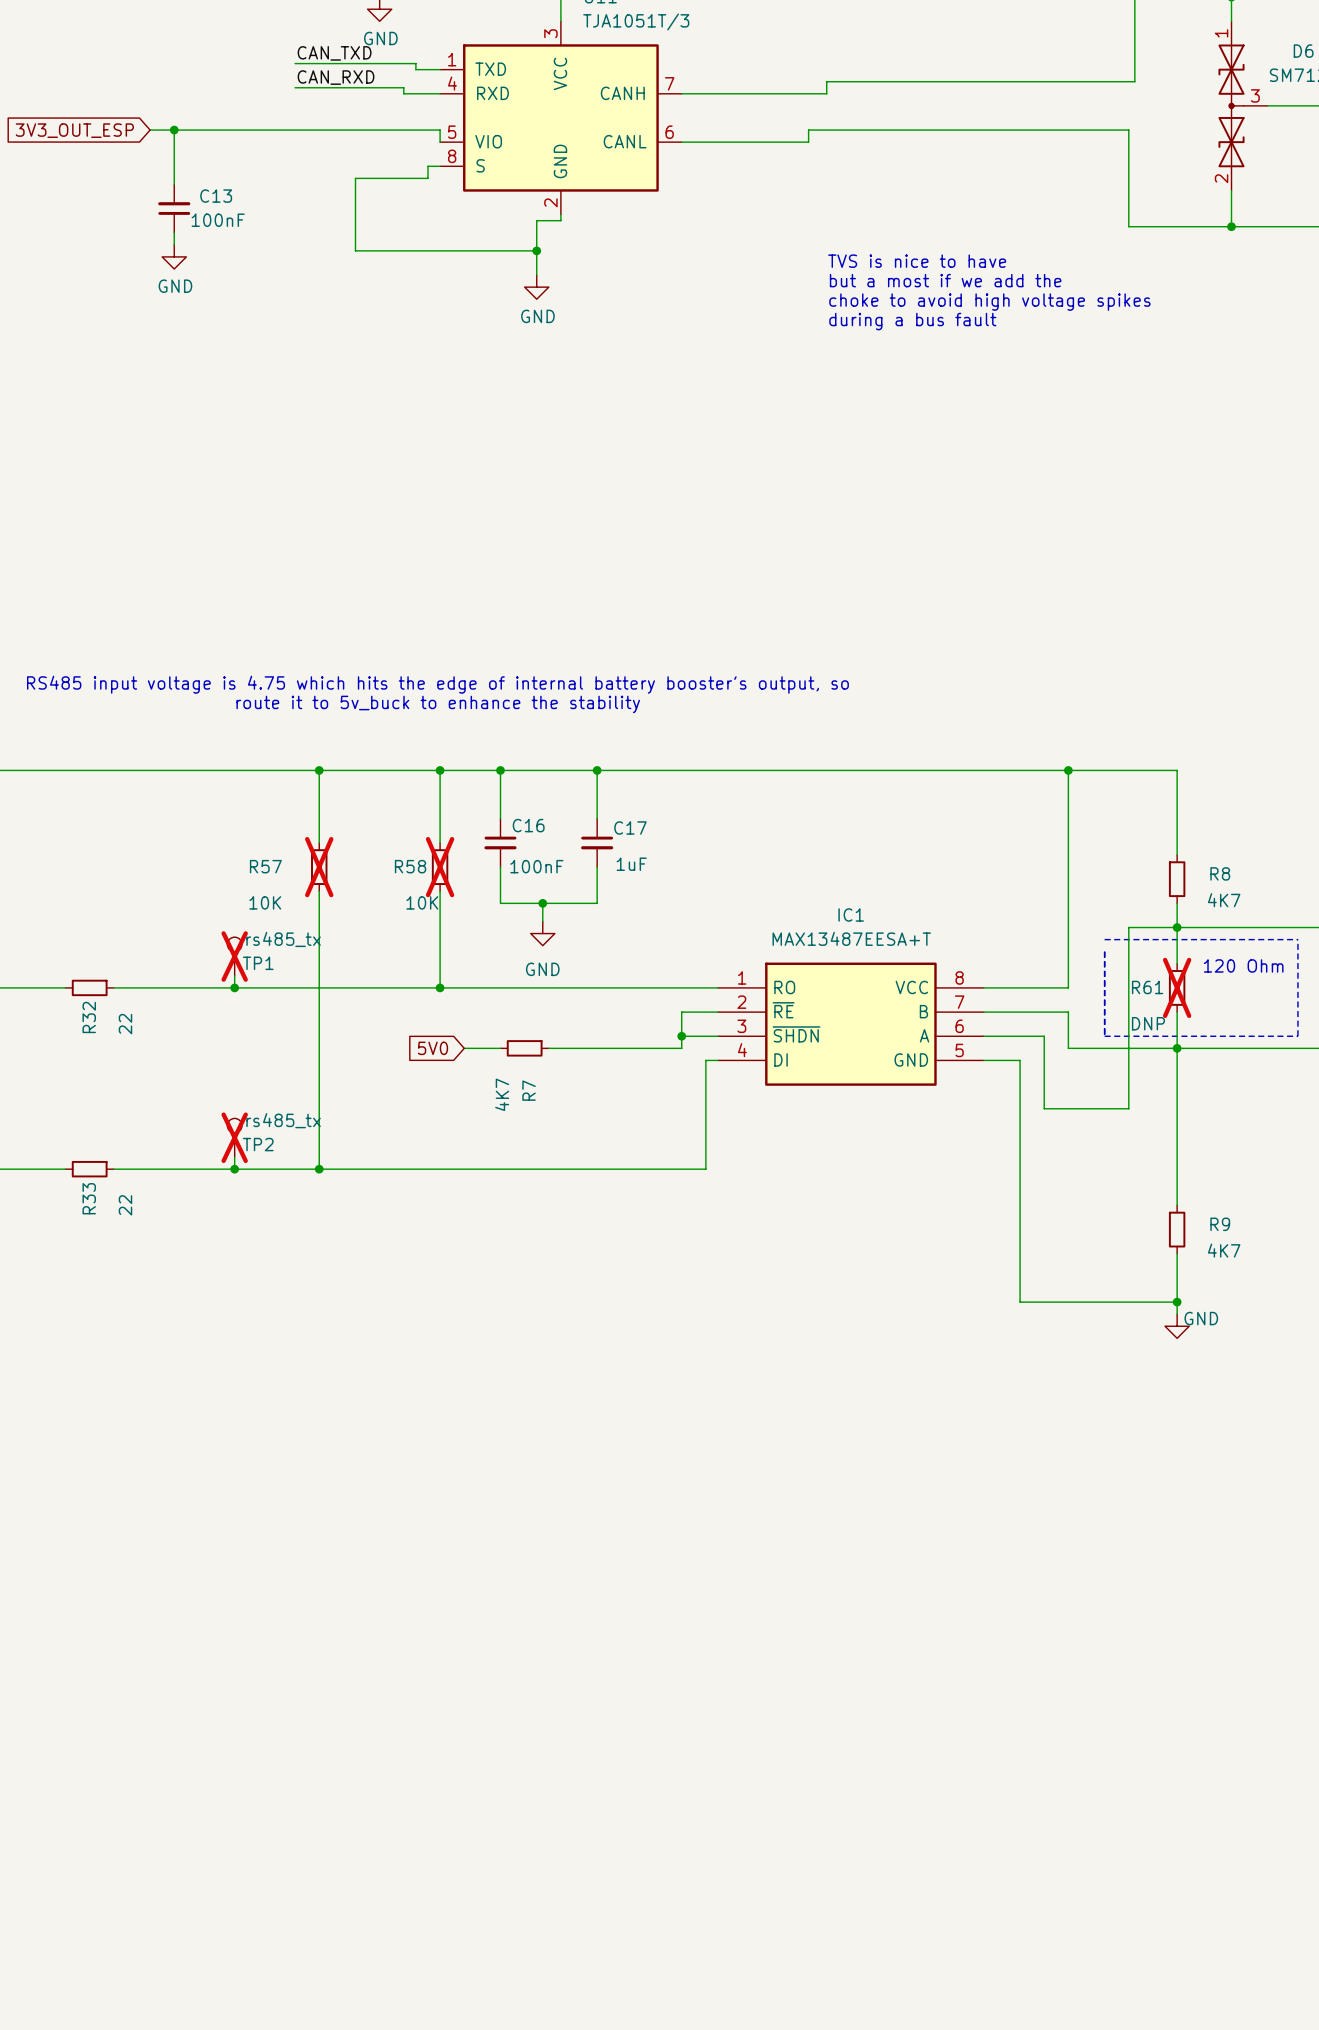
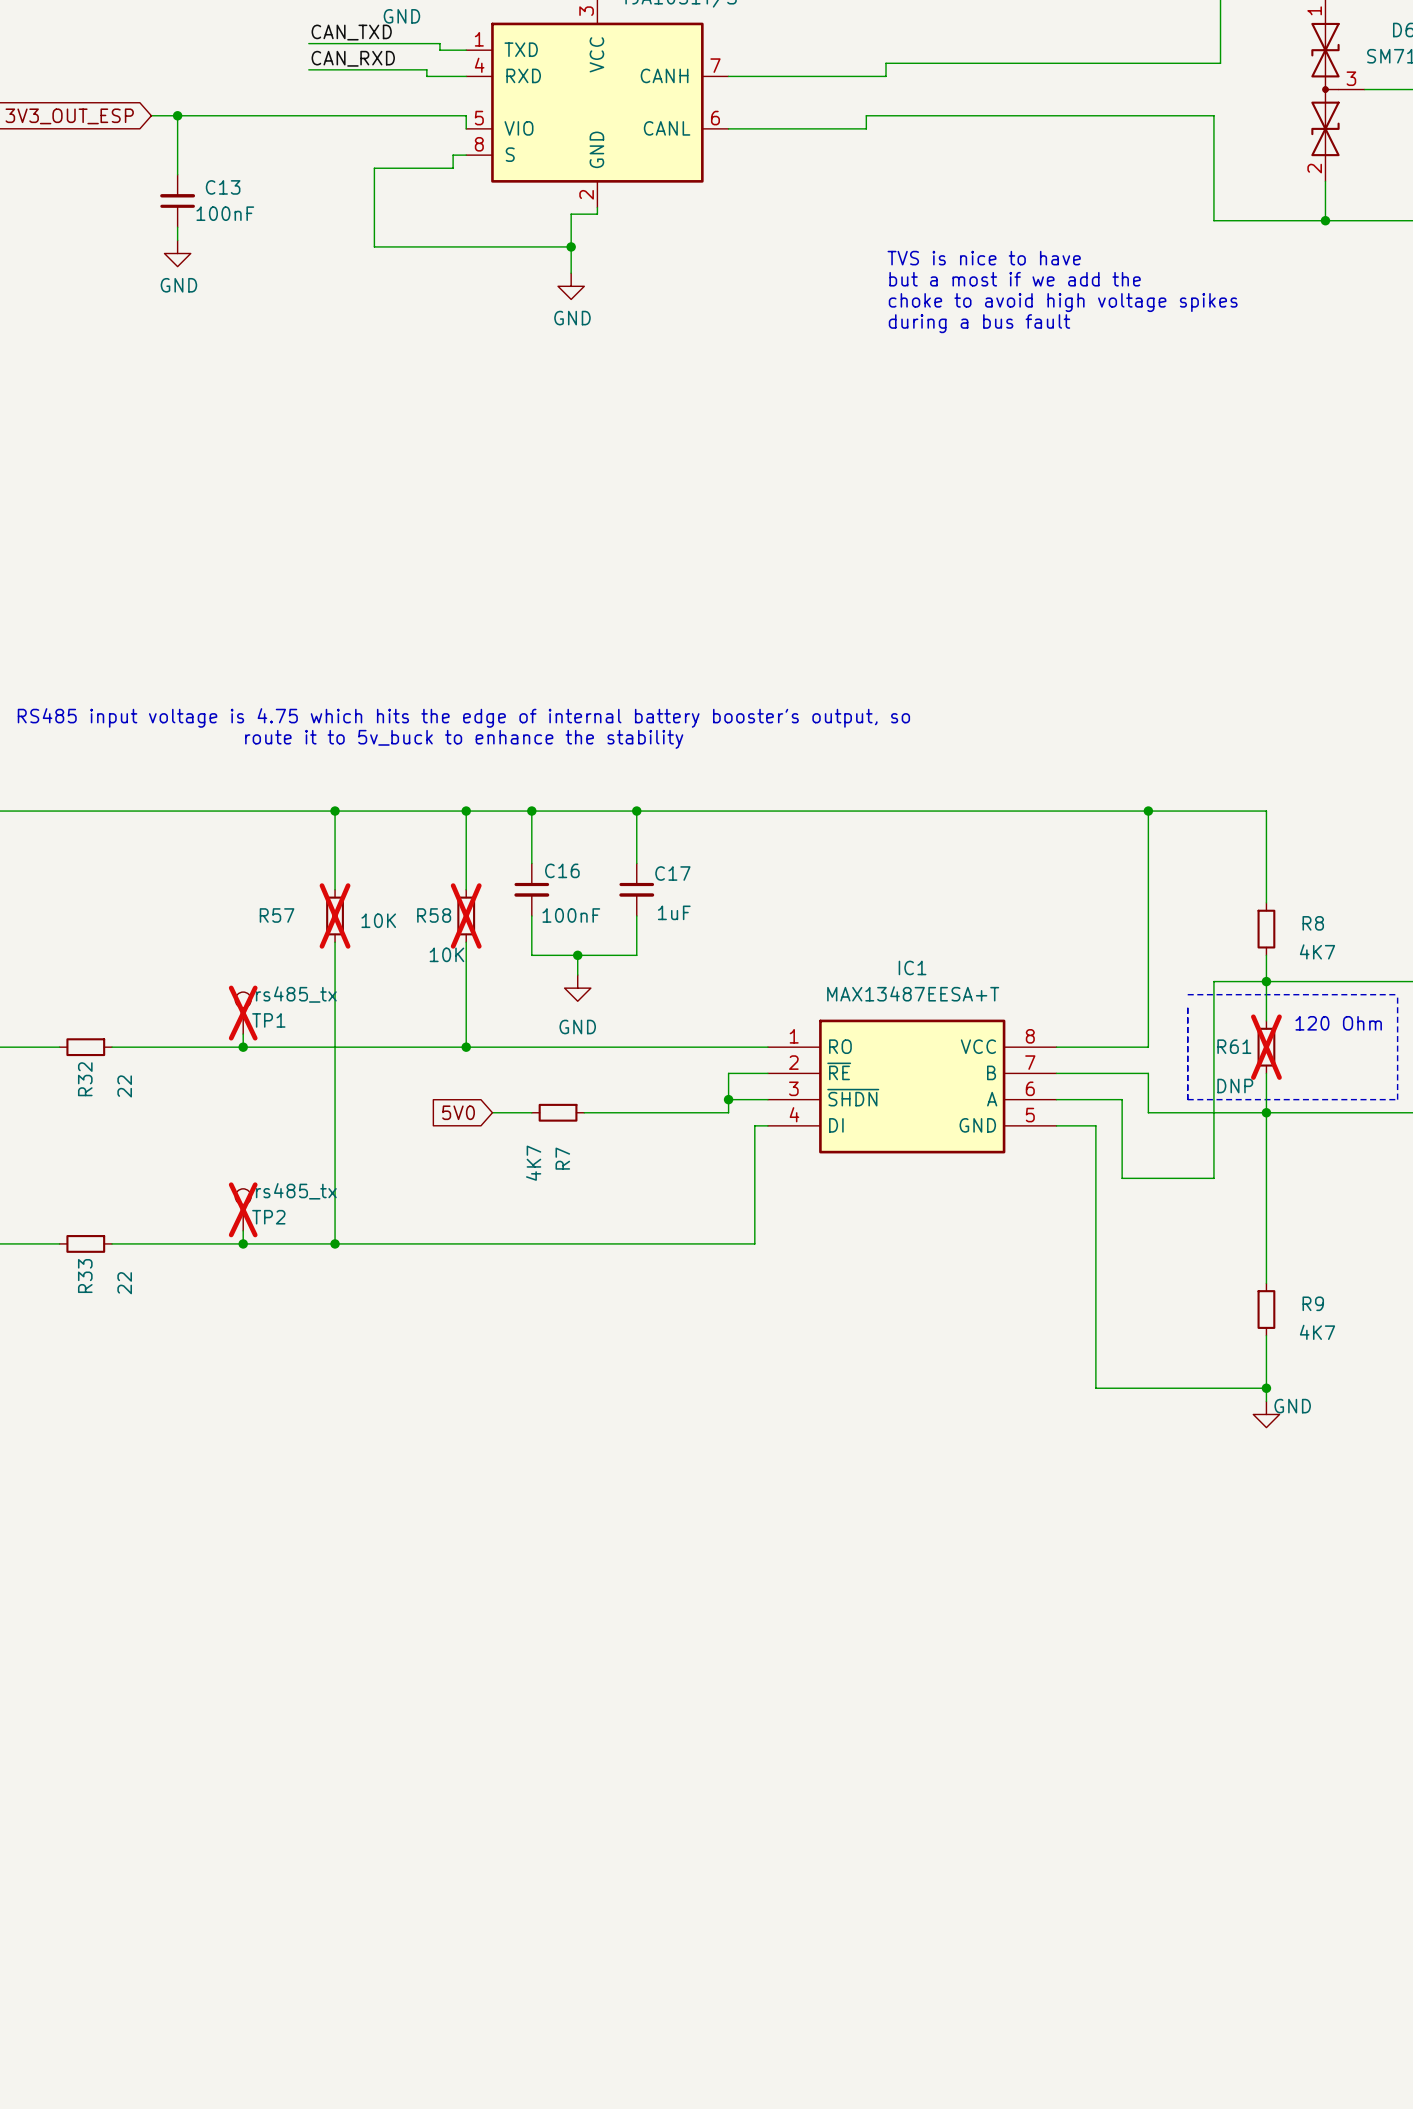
R57 value position: 10K (265, 902) -> 10K (378, 920)

